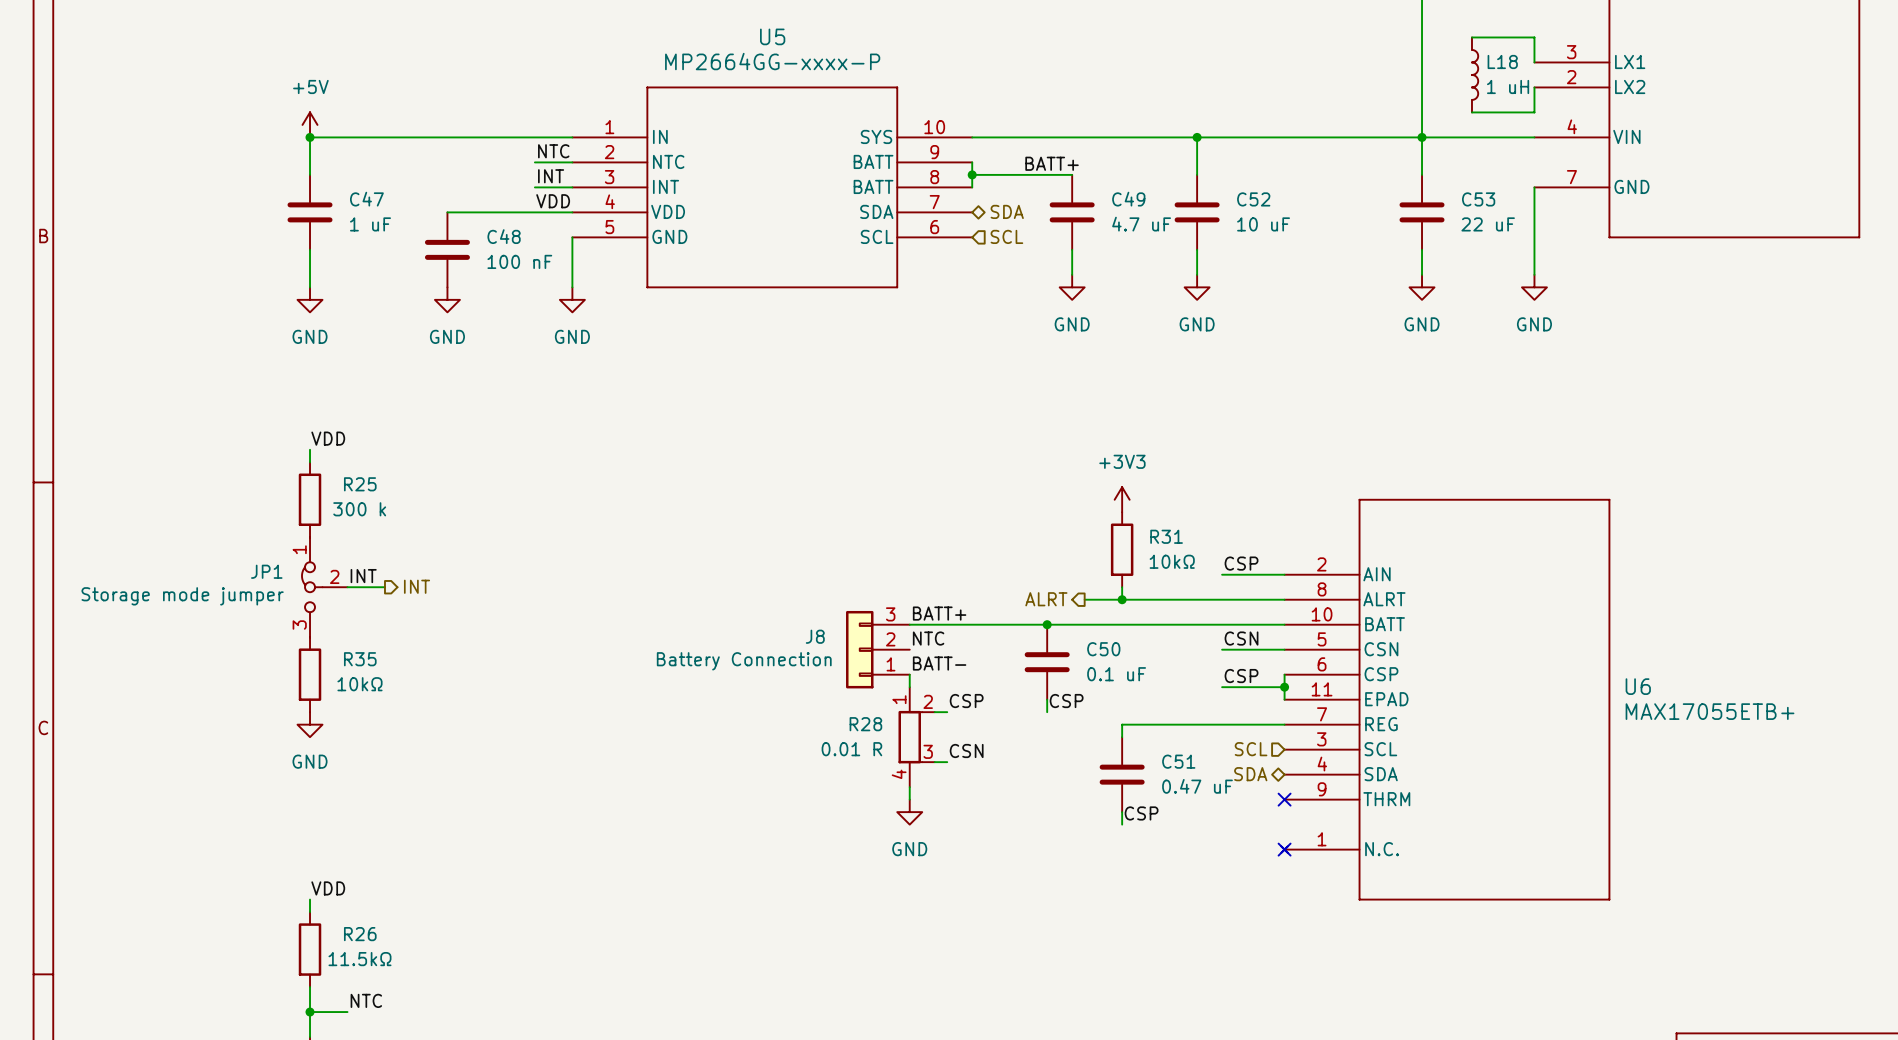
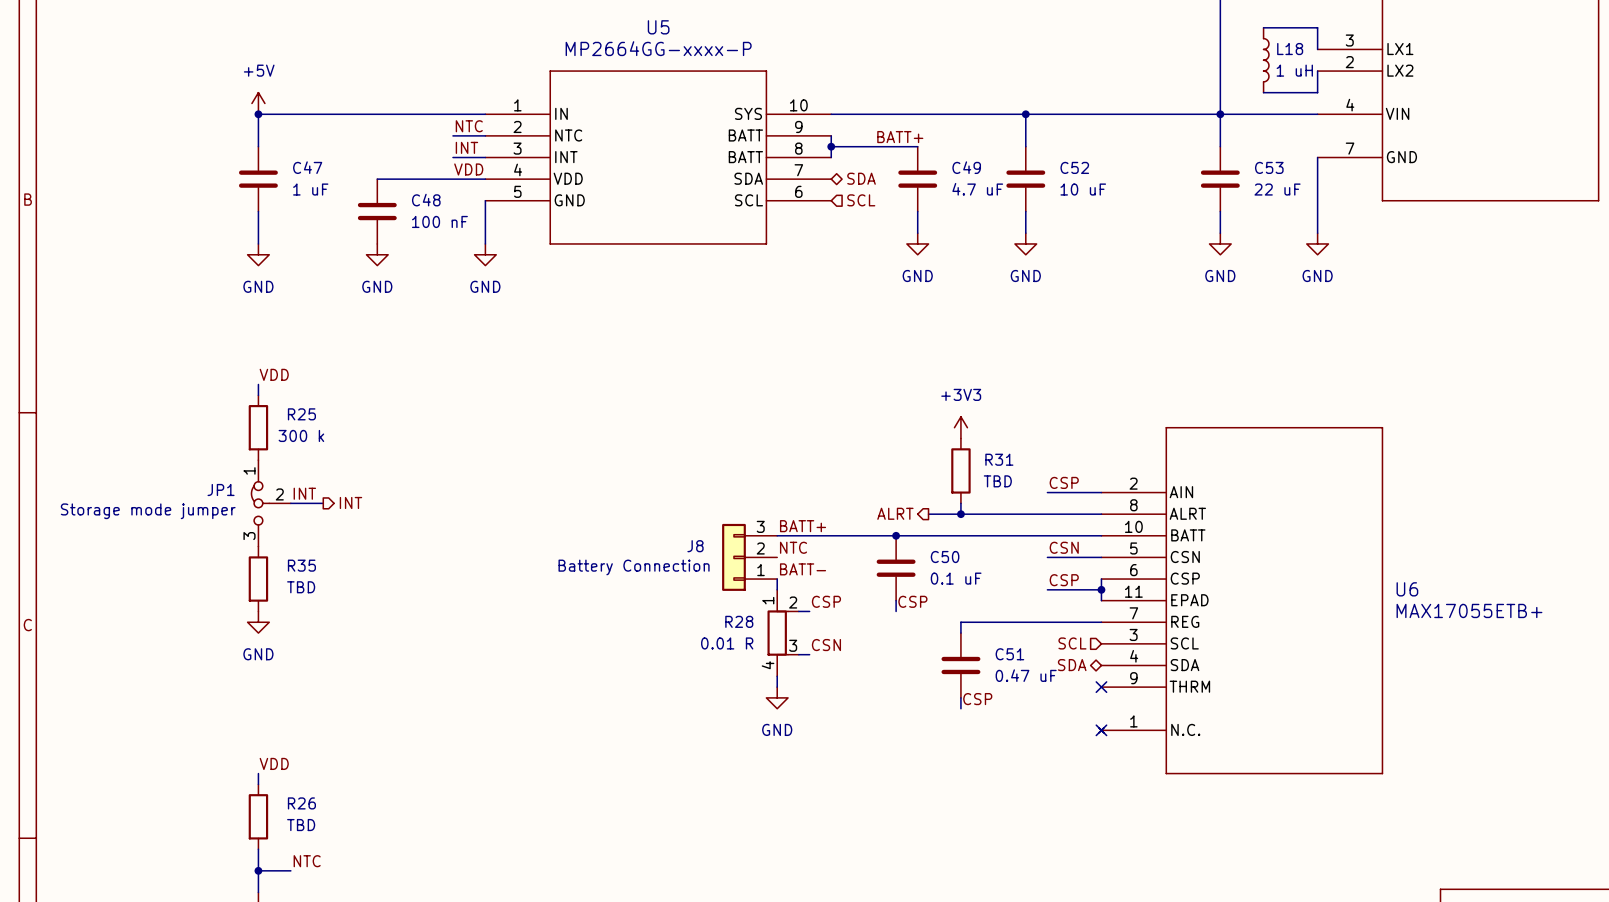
R31 value: 10kΩ (1172, 561) -> TBD (997, 481)
R35 value: 10kΩ (359, 684) -> TBD (301, 587)
R26 value: 11.5kΩ (359, 959) -> TBD (301, 825)

